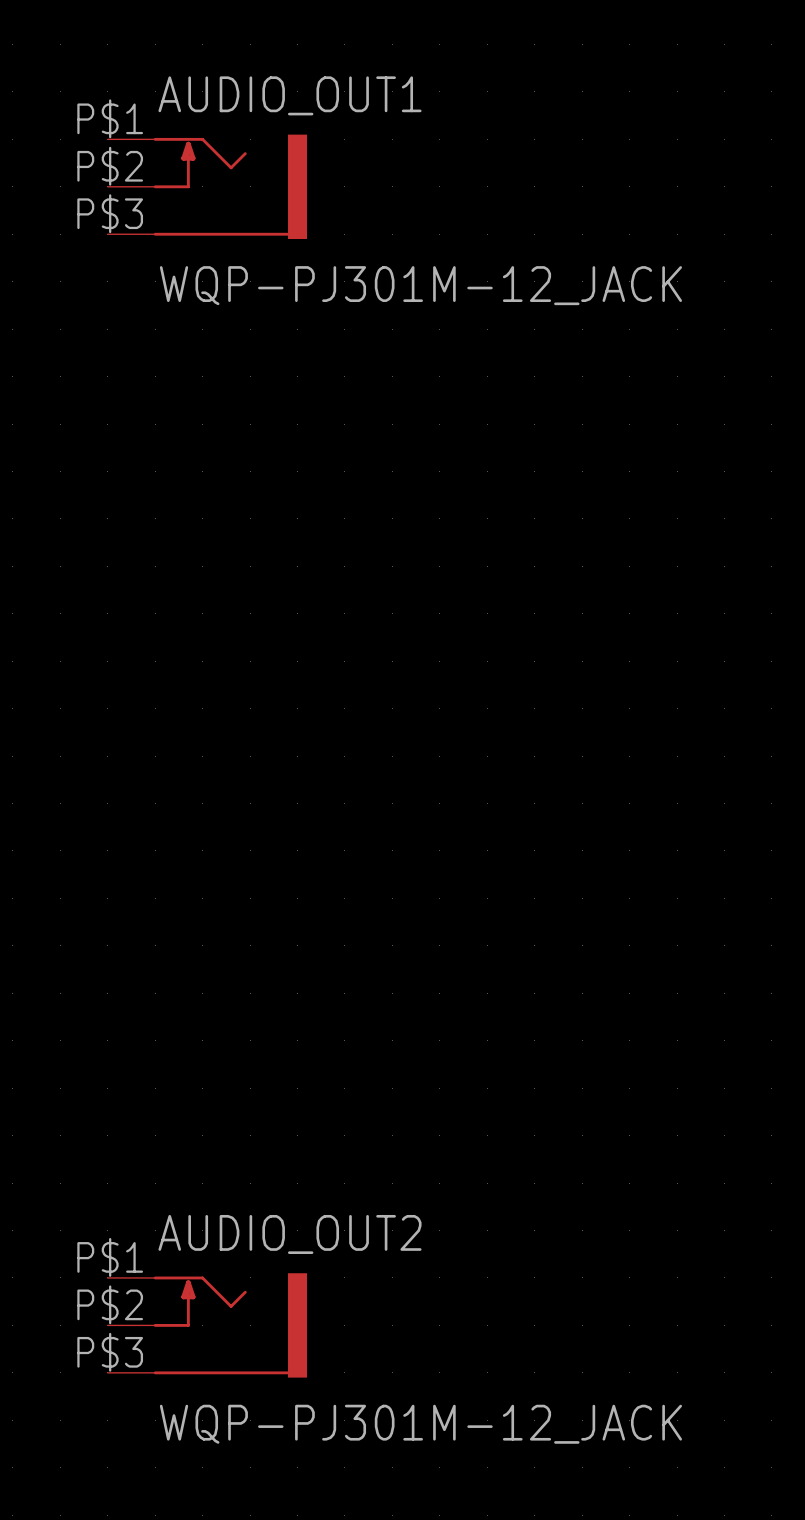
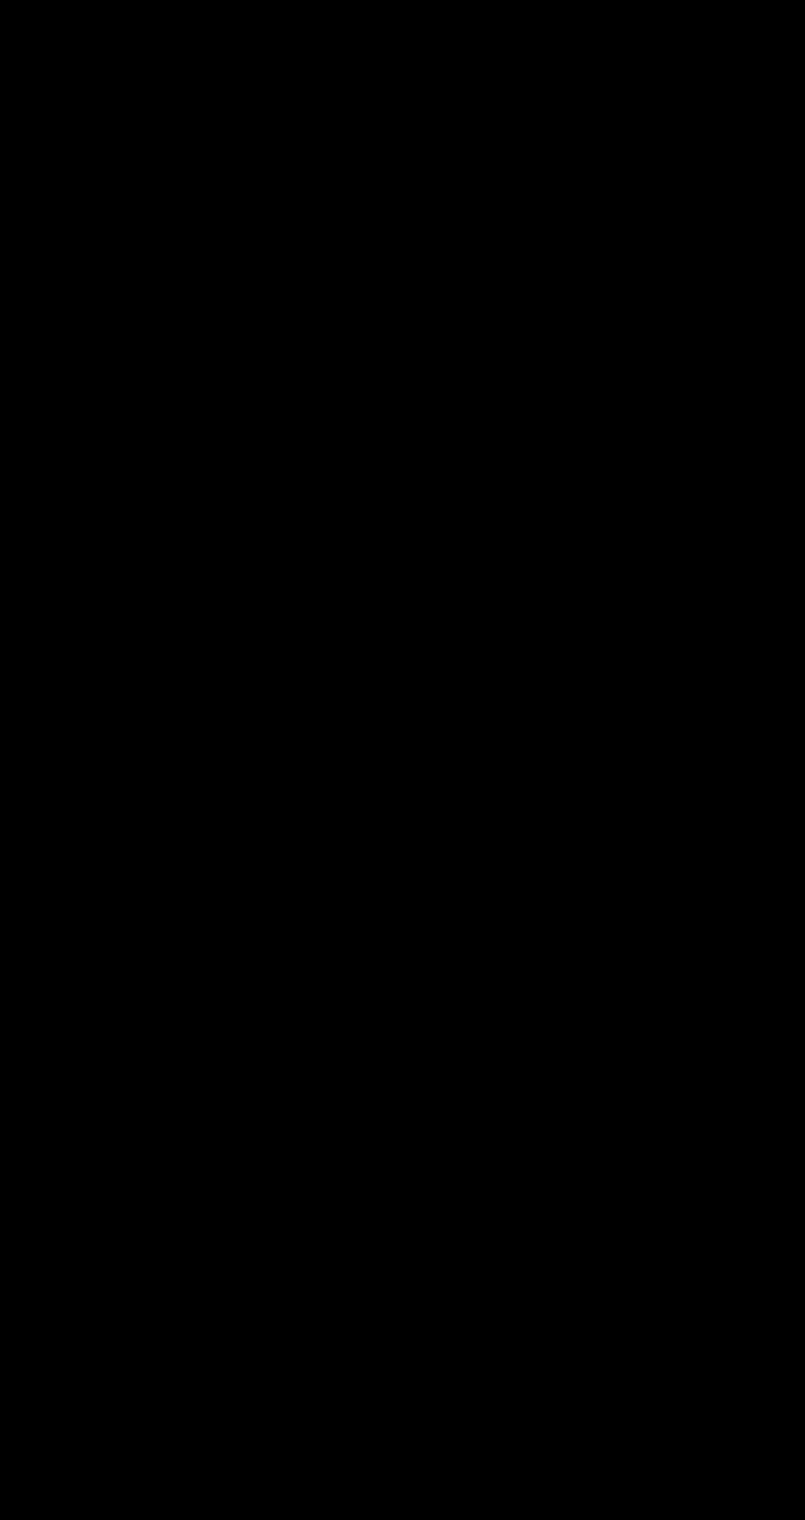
AUDIO_OUT1: WQP-PJ301M-12_JACK (207, 186) -> none
AUDIO_OUT2: WQP-PJ301M-12_JACK (207, 1325) -> none

